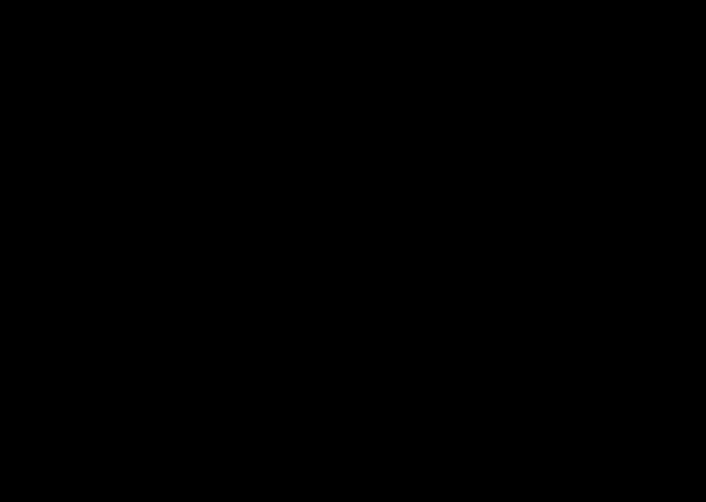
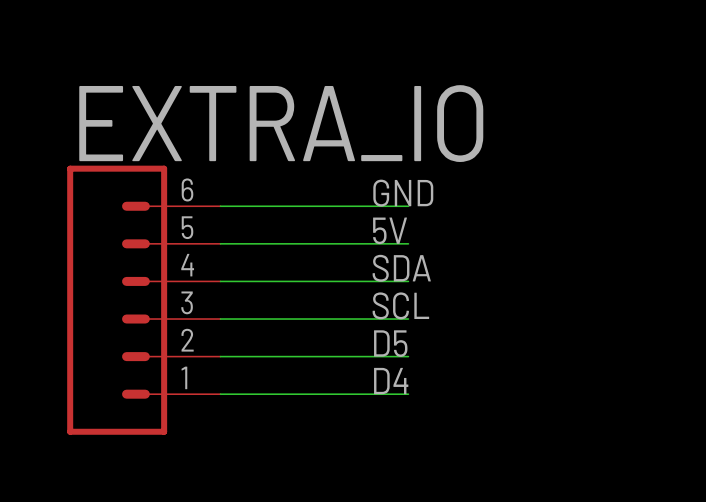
label: none -> GND (403, 193)
wire: none -> (220, 206) (408, 206)
label: none -> 5V (390, 230)
wire: none -> (220, 243) (408, 243)
label: none -> SDA (401, 268)
wire: none -> (220, 281) (408, 281)
EXTRA_IO: none -> (143, 300)
label: none -> SCL (400, 305)
wire: none -> (220, 319) (408, 319)
label: none -> D5 (390, 343)
wire: none -> (220, 356) (408, 356)
label: none -> D4 (391, 381)
wire: none -> (220, 394) (408, 394)

